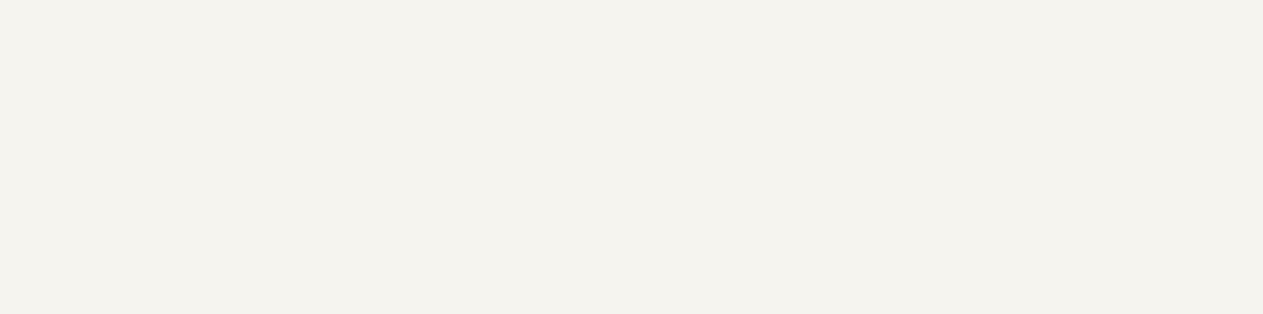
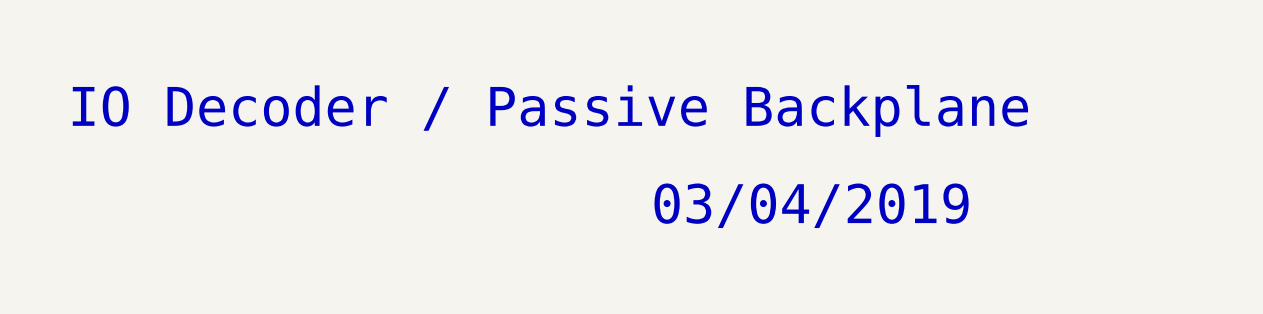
text: none -> IO Decoder / Passive Backplane (550, 110)
text: none -> 03/04/2019 (811, 205)

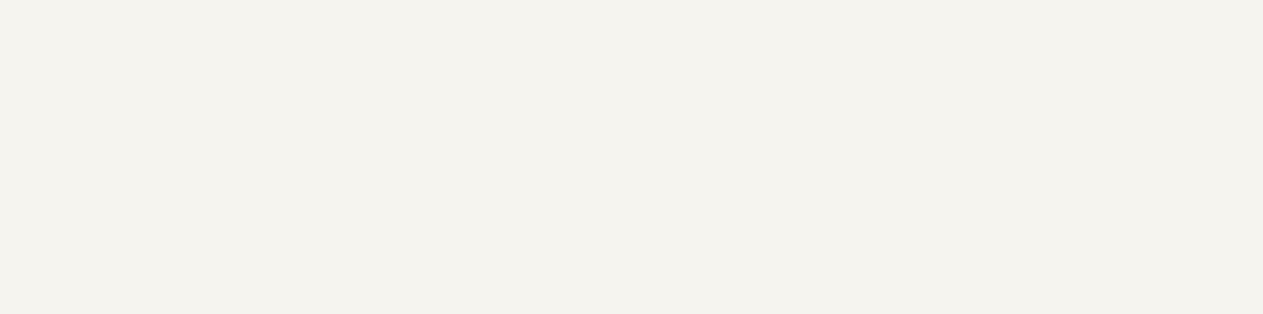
text: IO Decoder / Passive Backplane (550, 110) -> none
text: 03/04/2019 (811, 205) -> none

